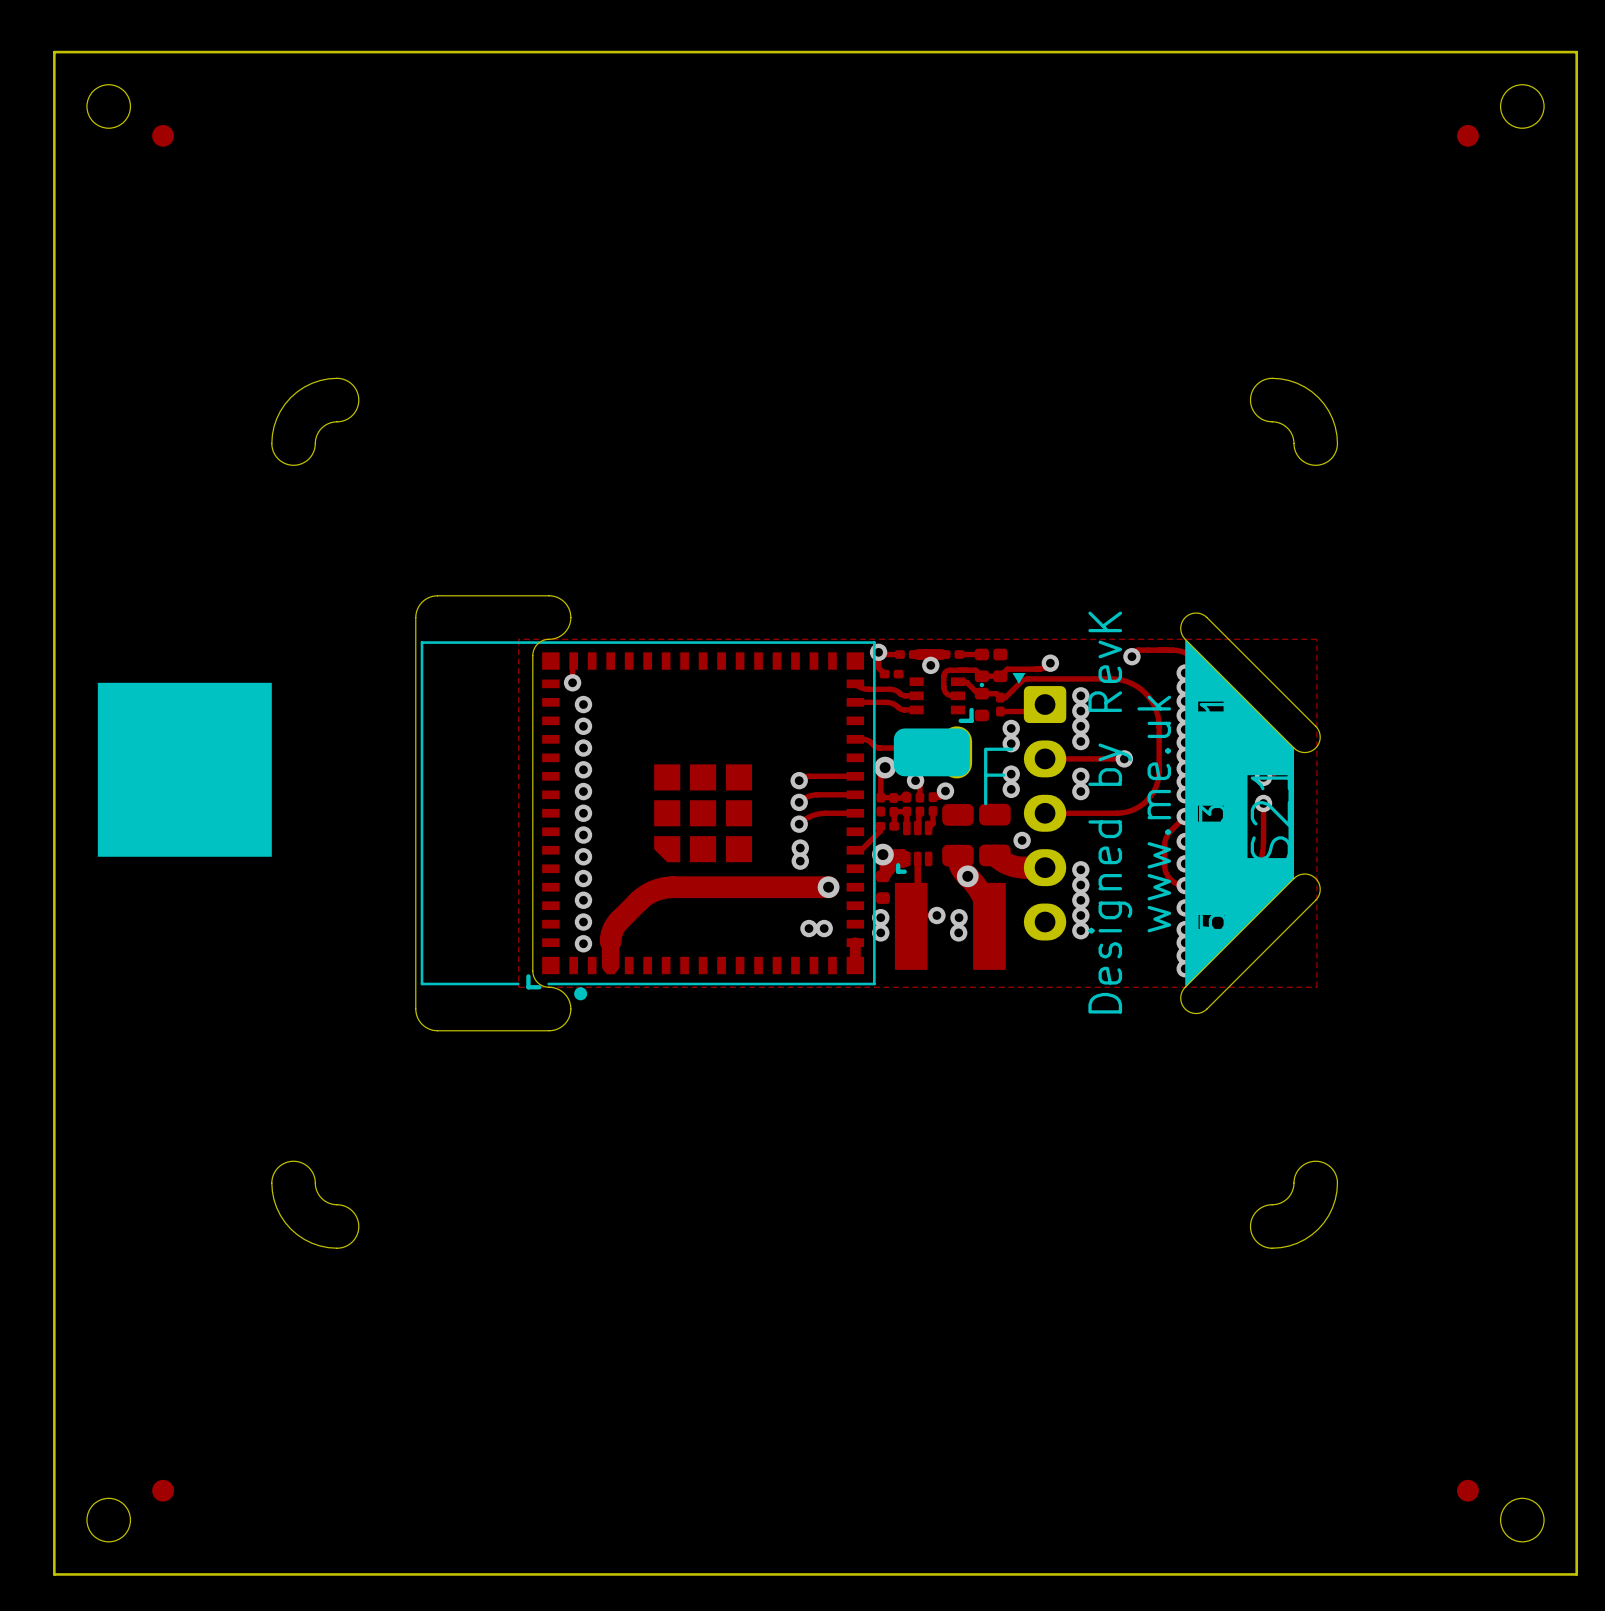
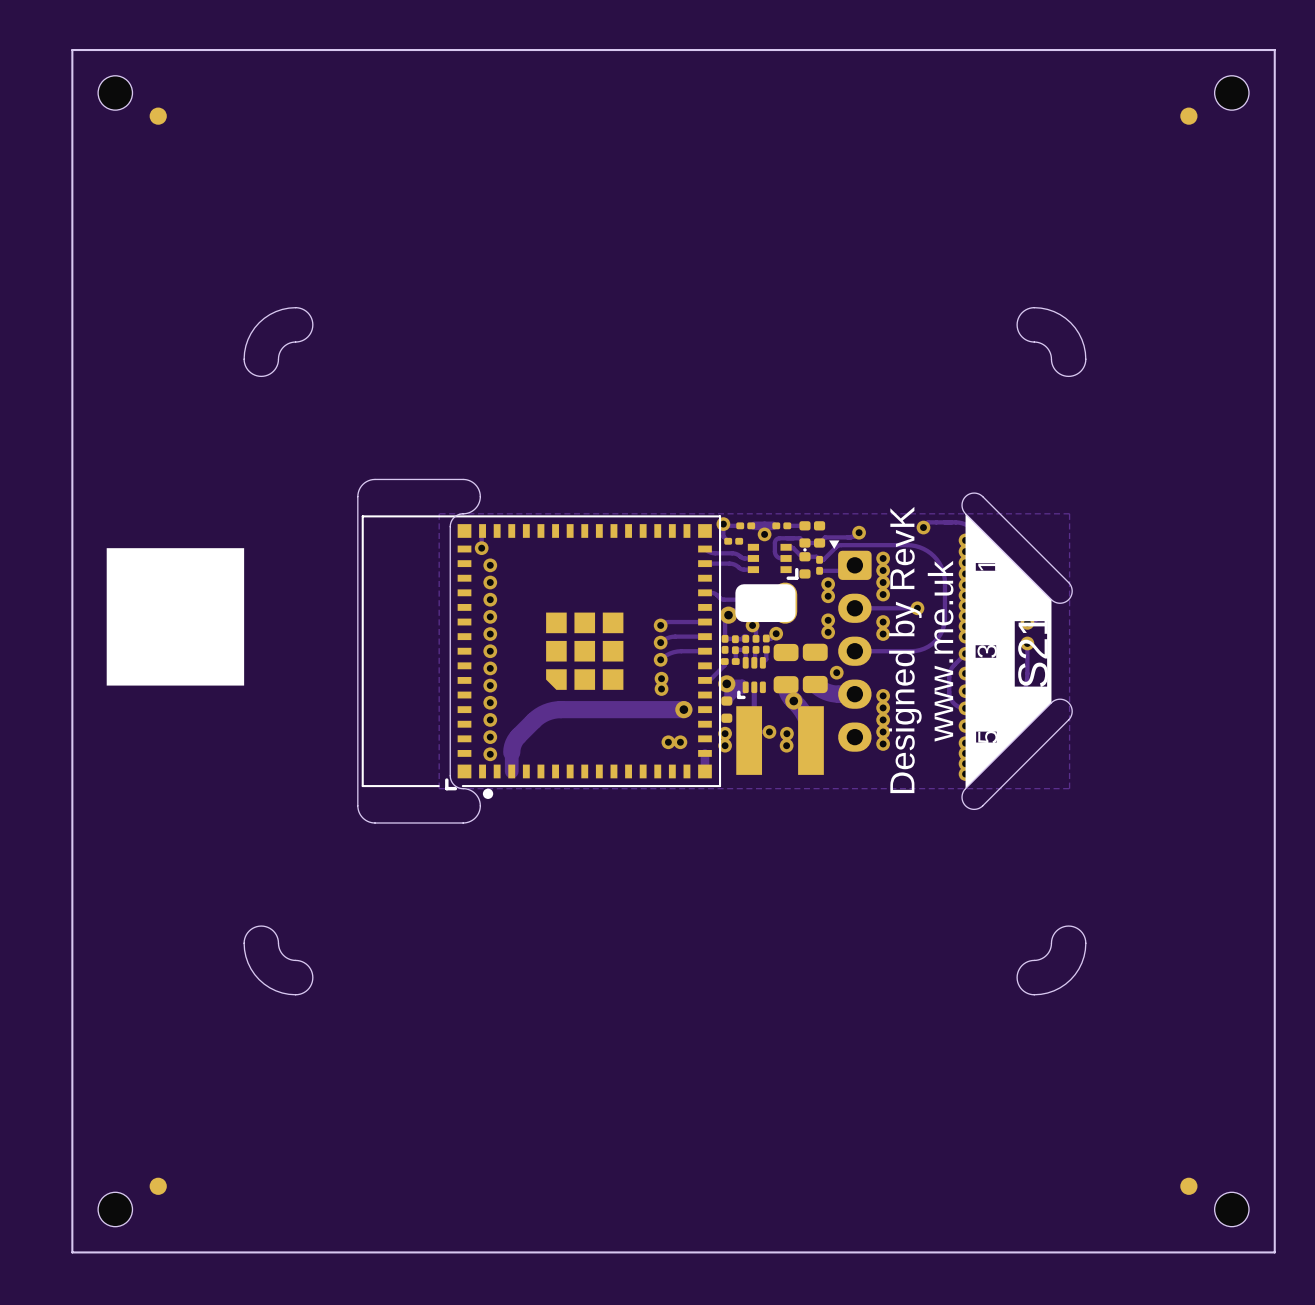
text: F (998, 776) -> none

